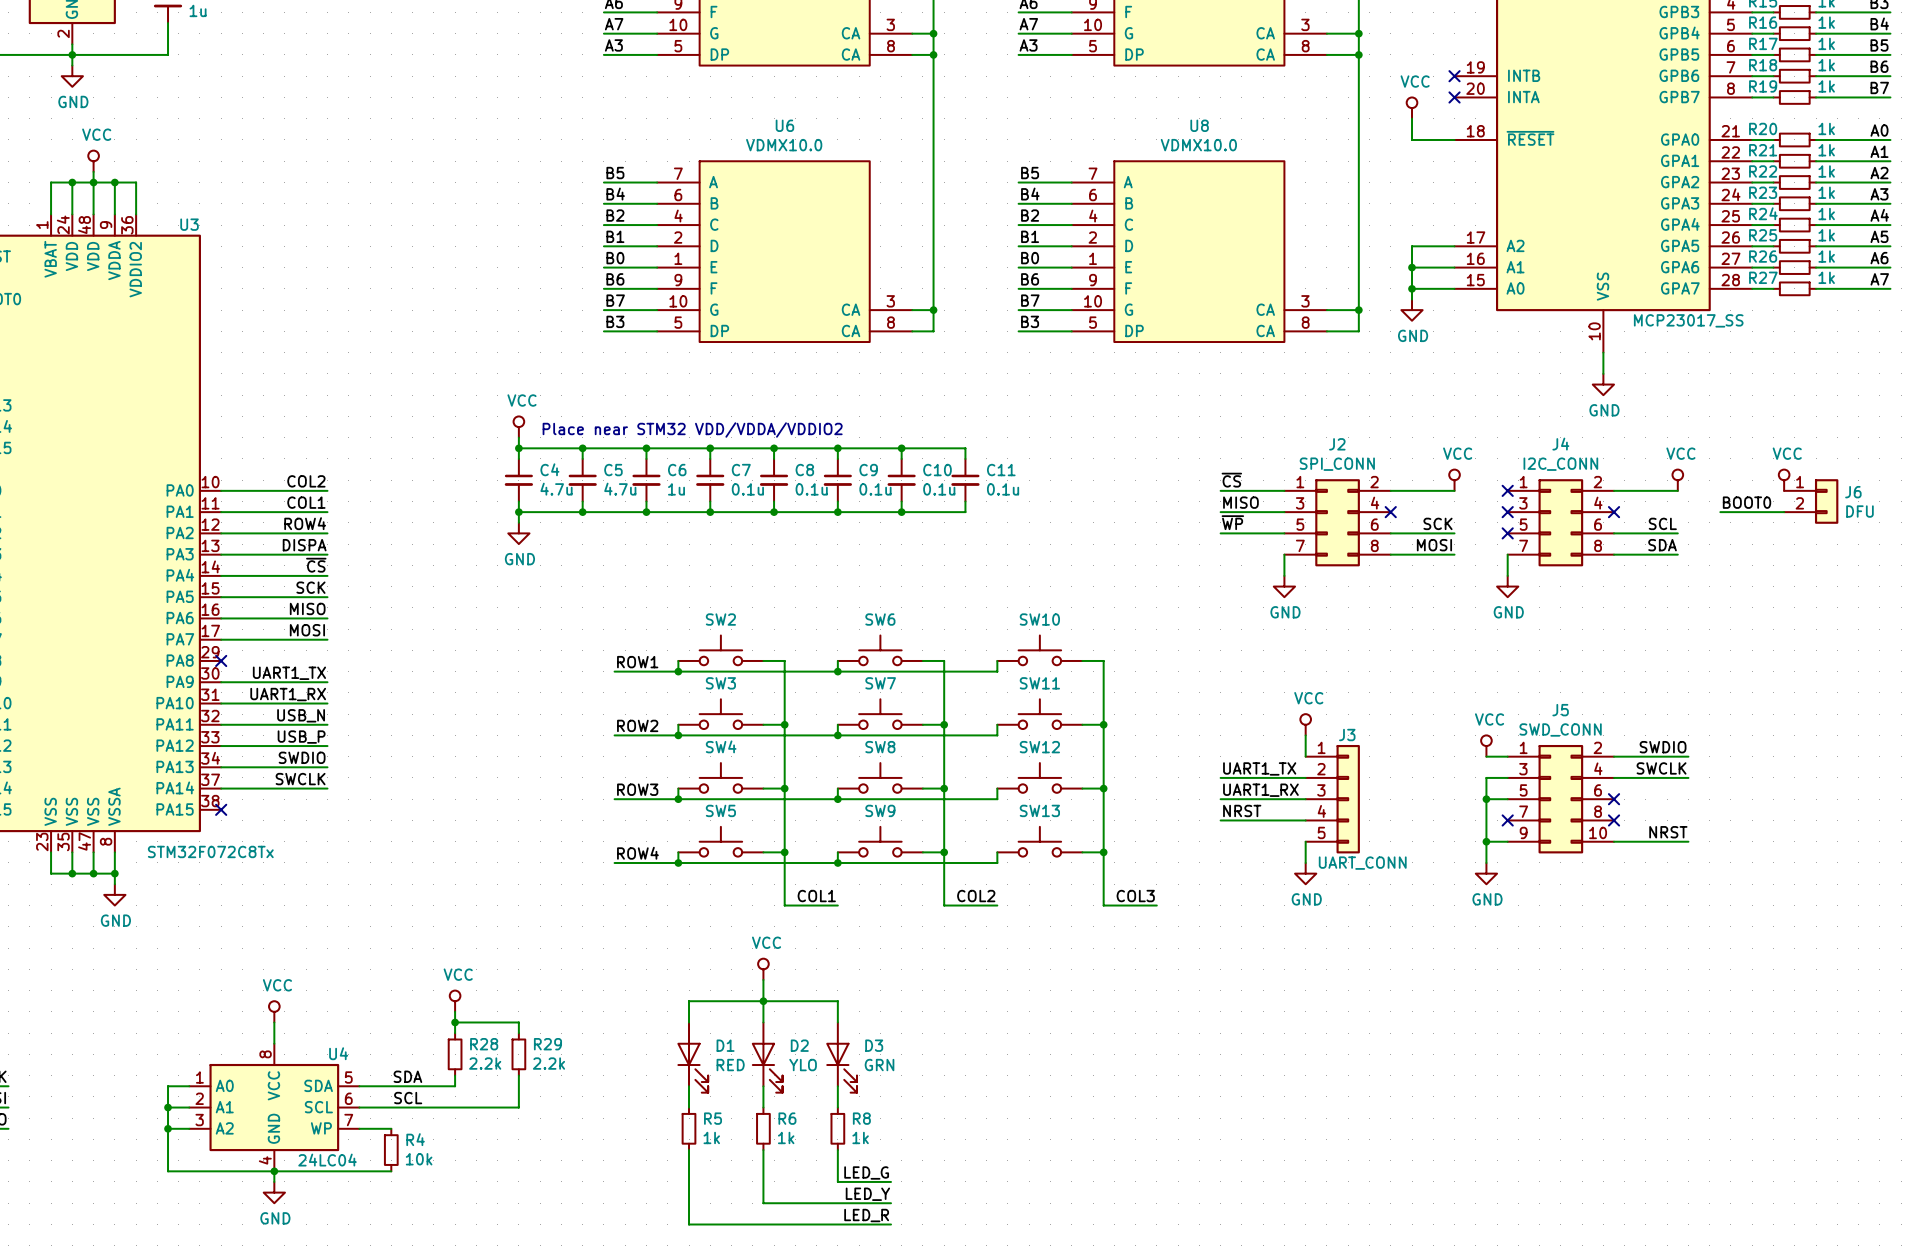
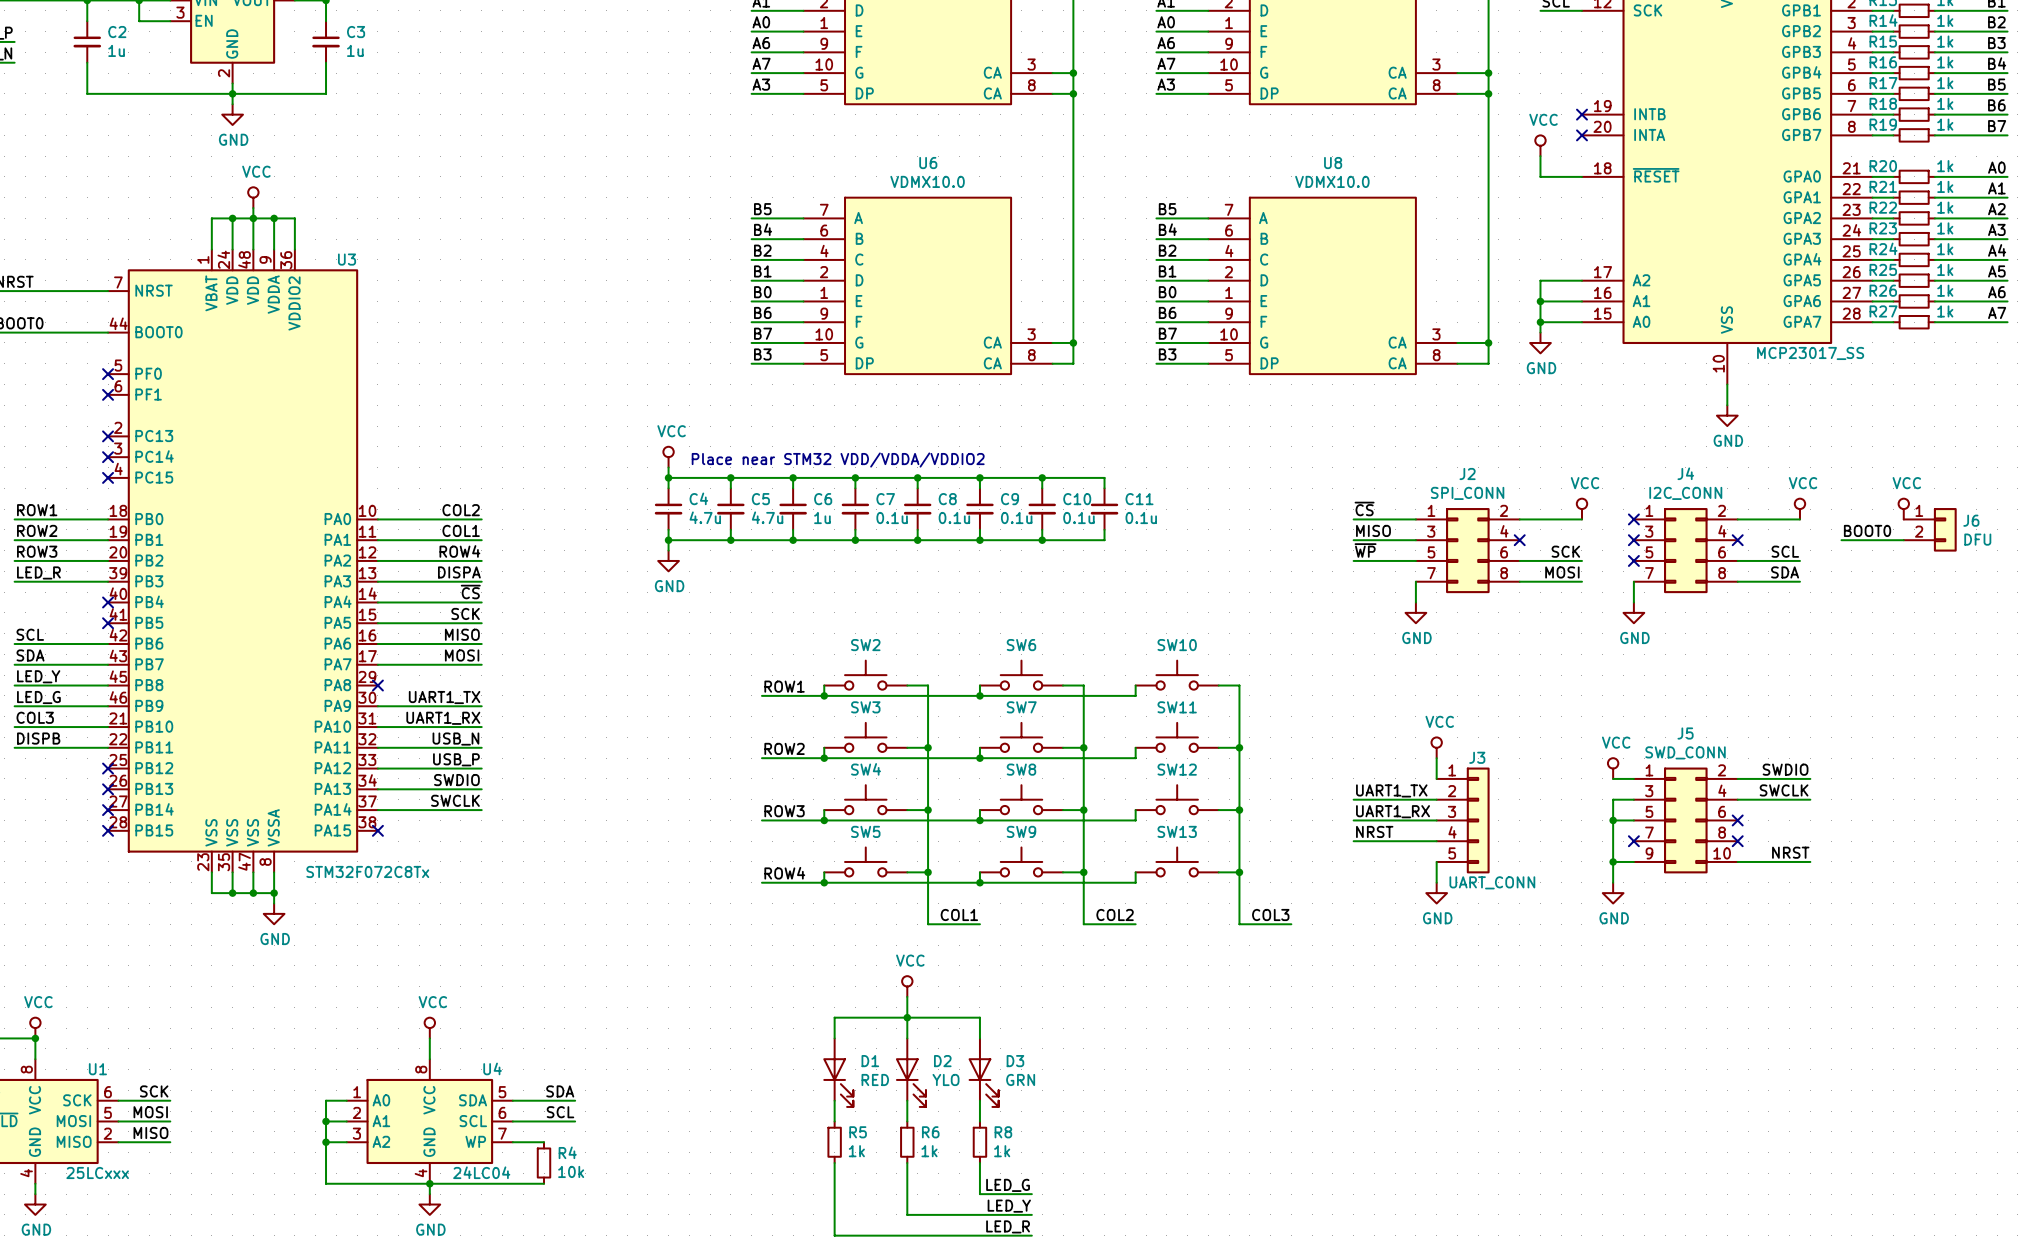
power symbol: VCC (455, 1001) -> none
wire: (455, 1011) (455, 1033) -> none
wire: (455, 1022) (518, 1022) (518, 1033) -> none
junction: (455, 1022) -> none
R28: 2.2k (455, 1054) -> none
R29: 2.2k (518, 1054) -> none
wire: (455, 1075) (455, 1086) (423, 1086) -> none
wire: (518, 1075) (518, 1107) (423, 1107) -> none

